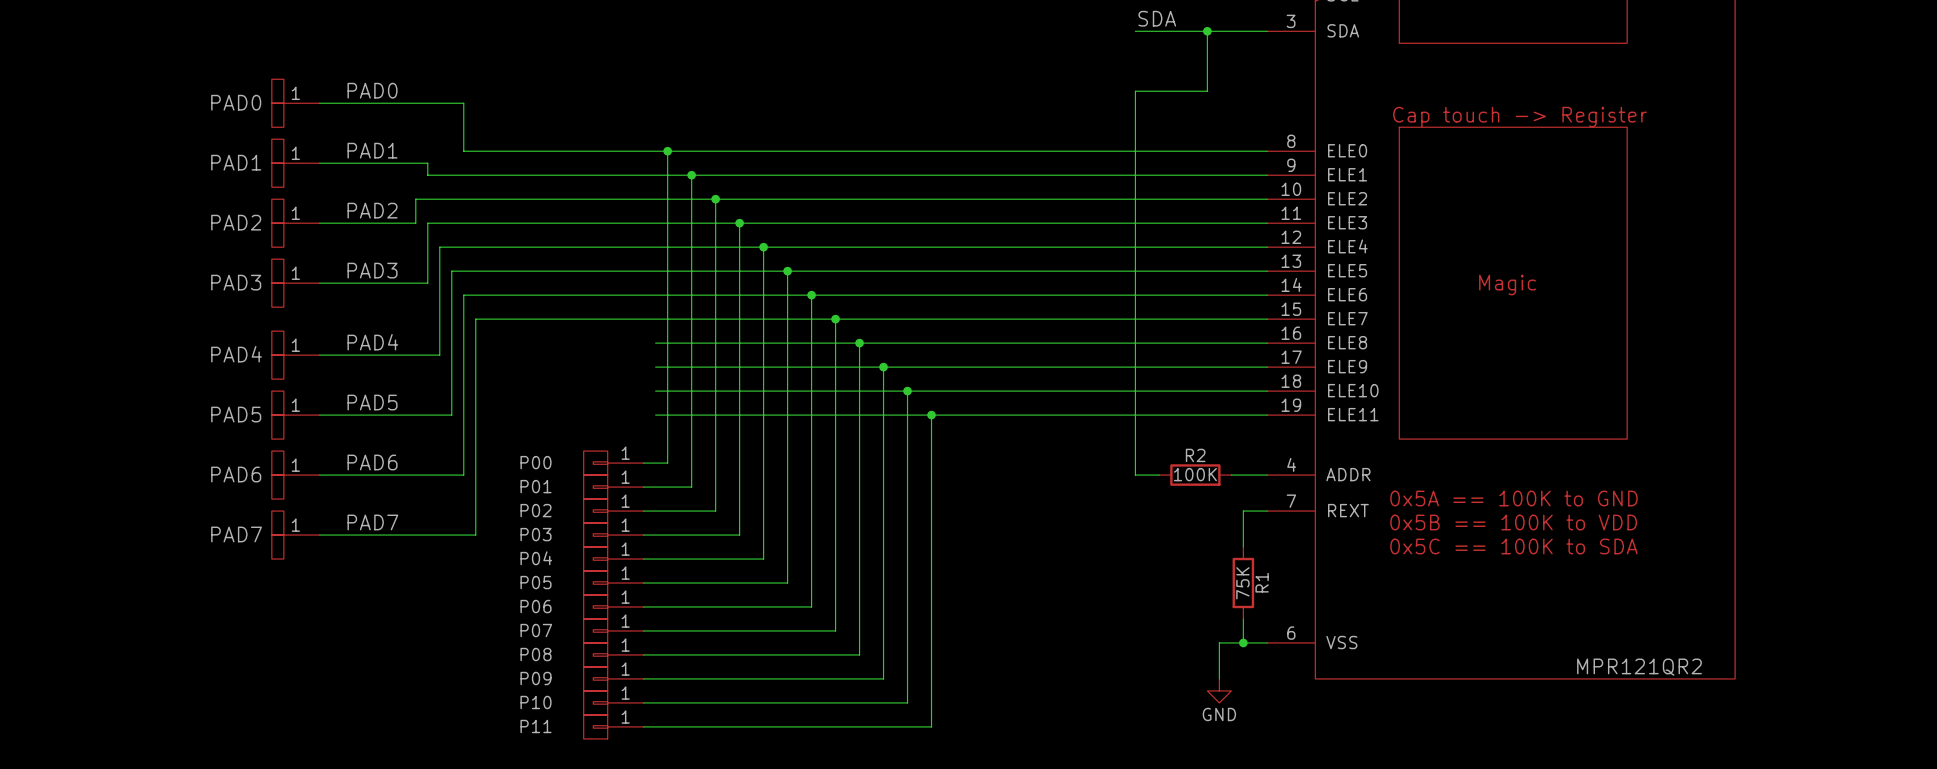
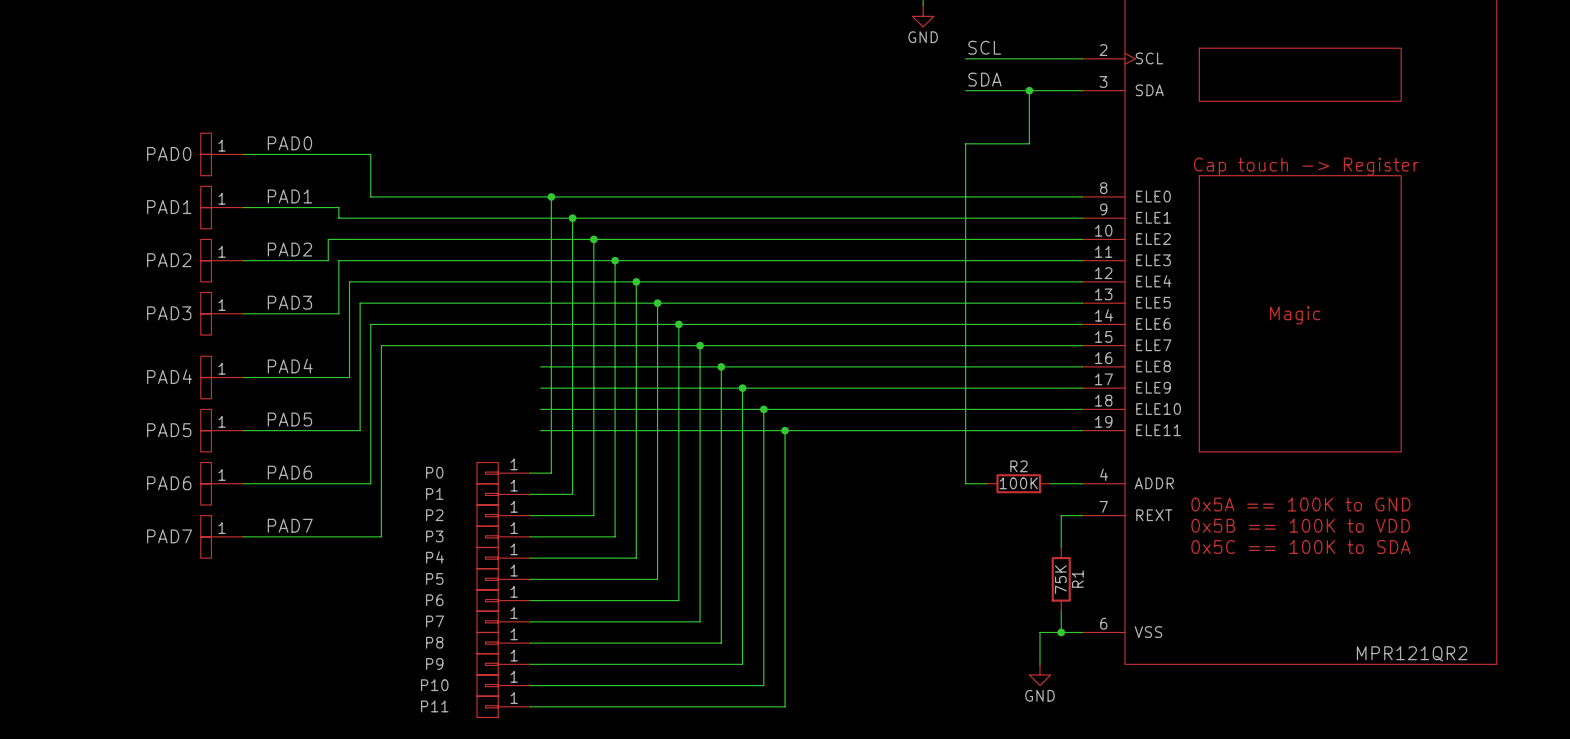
P00 name: P00 (536, 462) -> P0 (434, 472)
P01 name: P01 (536, 486) -> P1 (434, 493)
P02 name: P02 (536, 510) -> P2 (434, 515)
P03 name: P03 (536, 534) -> P3 (434, 536)
P04 name: P04 (536, 558) -> P4 (434, 557)
P05 name: P05 (536, 582) -> P5 (434, 578)
P06 name: P06 (536, 606) -> P6 (434, 600)
P07 name: P07 (536, 630) -> P7 (434, 621)
P08 name: P08 (536, 654) -> P8 (434, 642)
P09 name: P09 (536, 678) -> P9 (434, 663)

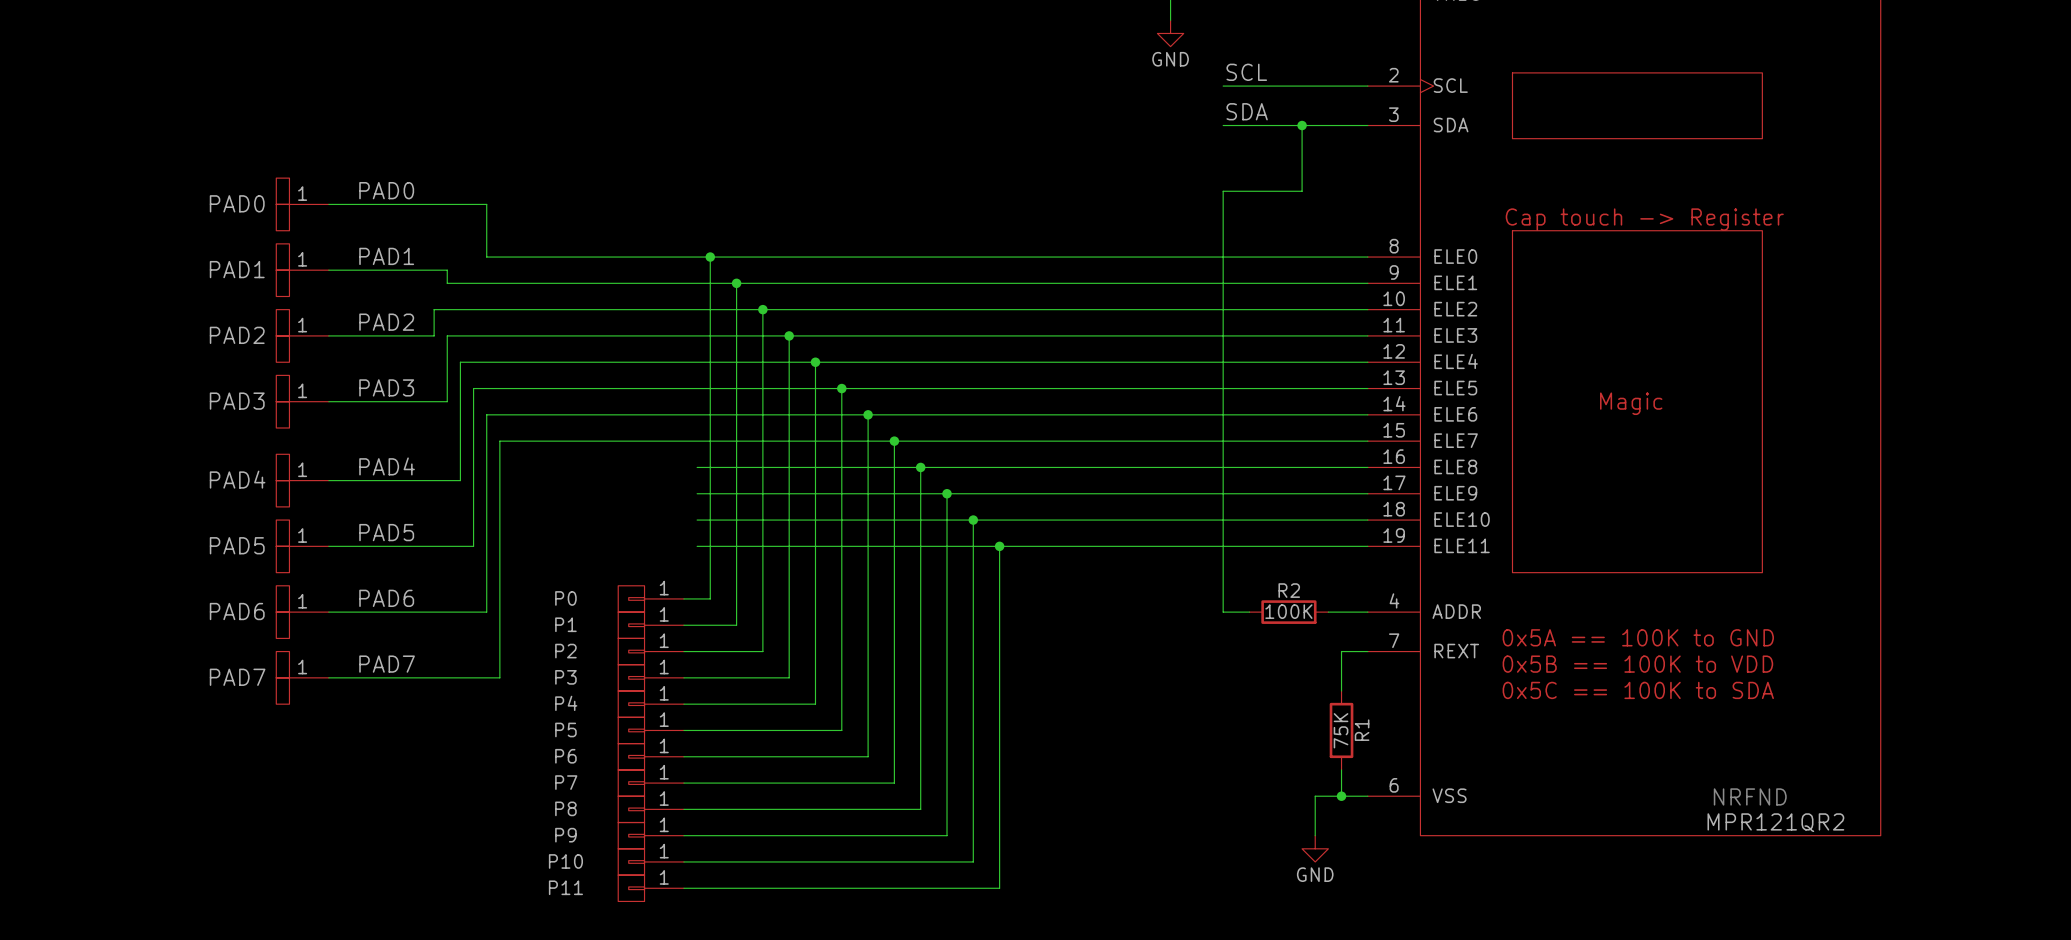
text: none -> NRFND (1750, 796)

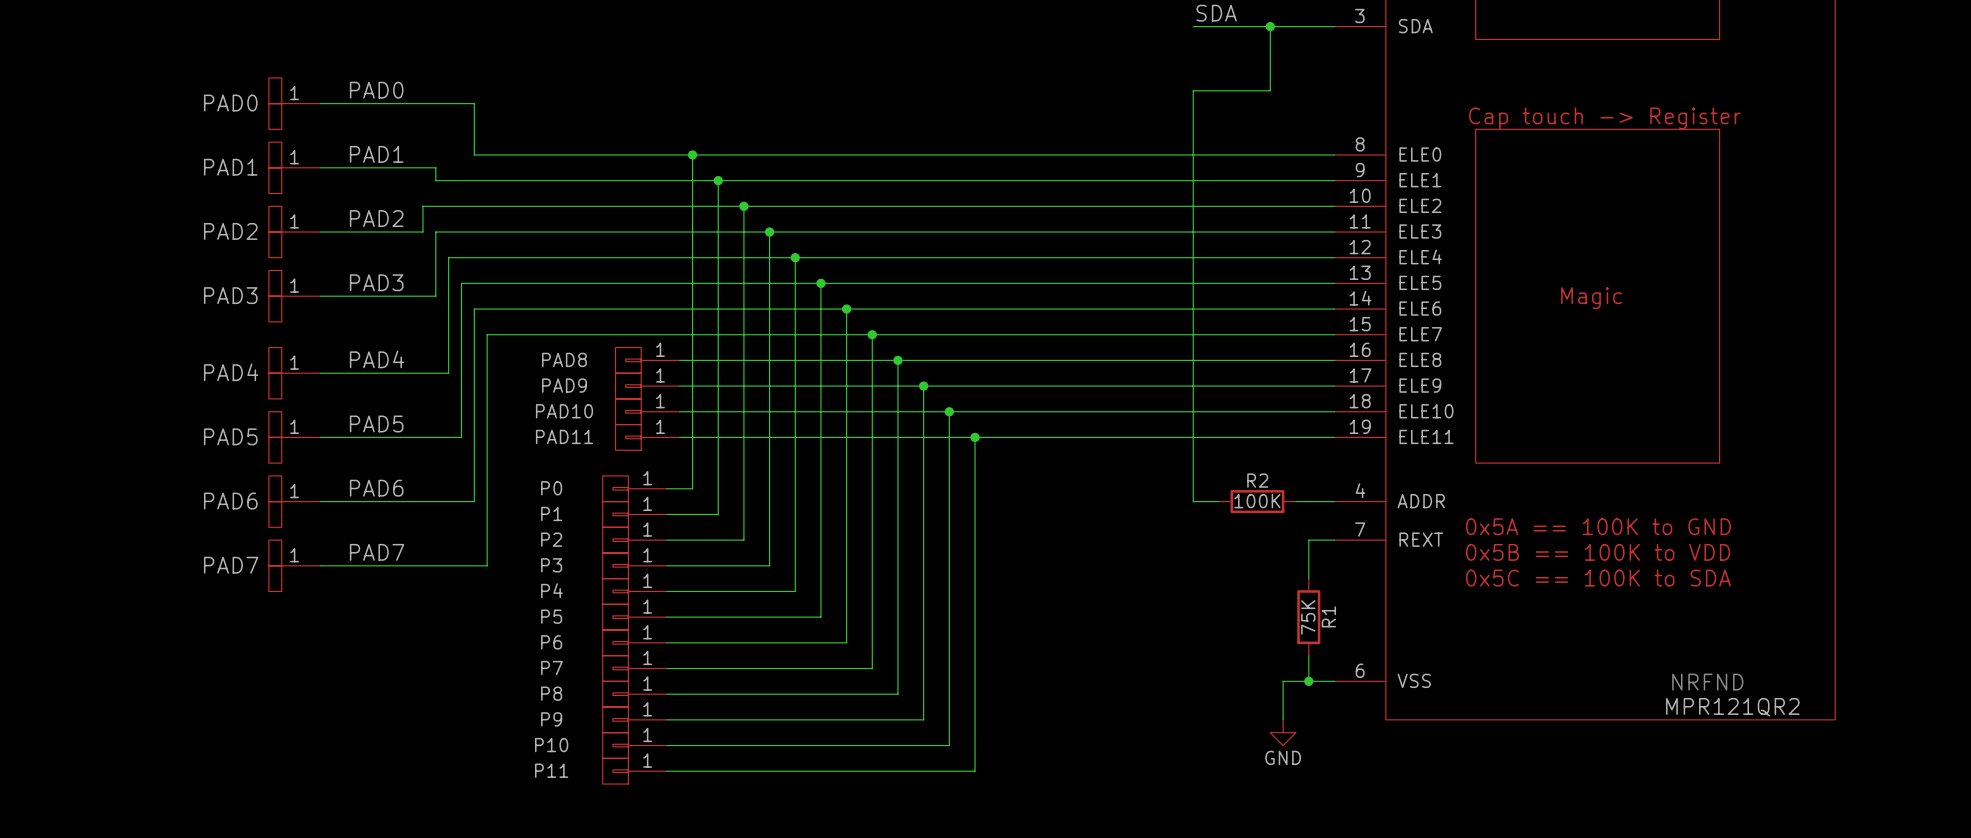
PAD8: none -> (647, 360)
PAD9: none -> (647, 386)
PAD10: none -> (647, 411)
PAD11: none -> (647, 437)

